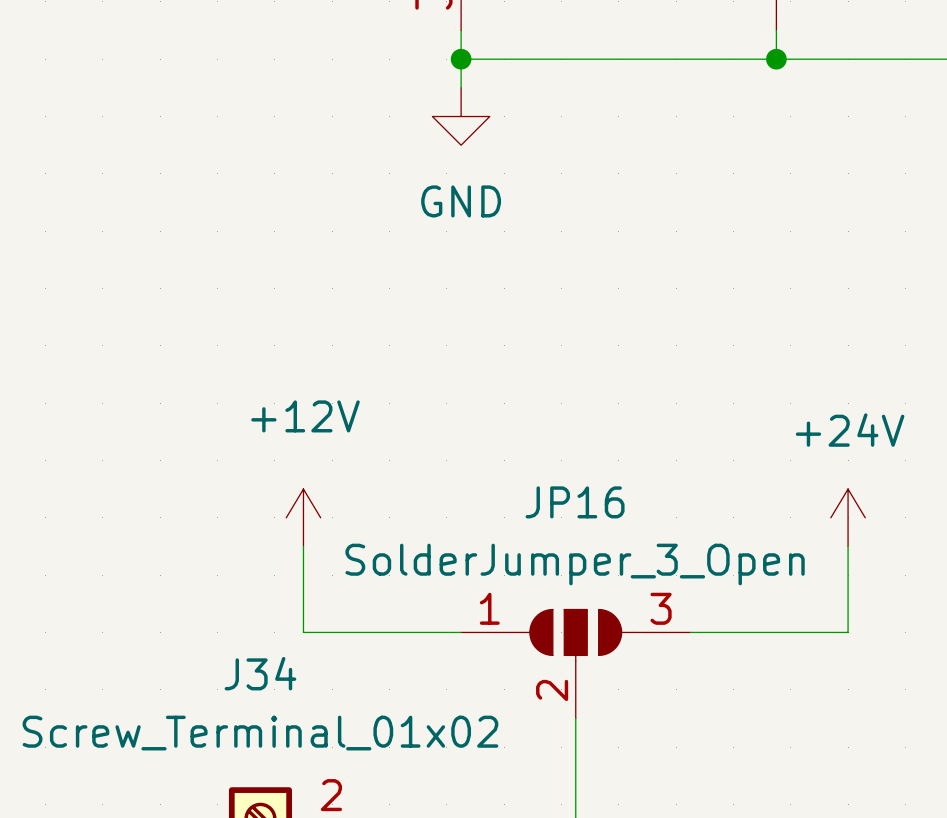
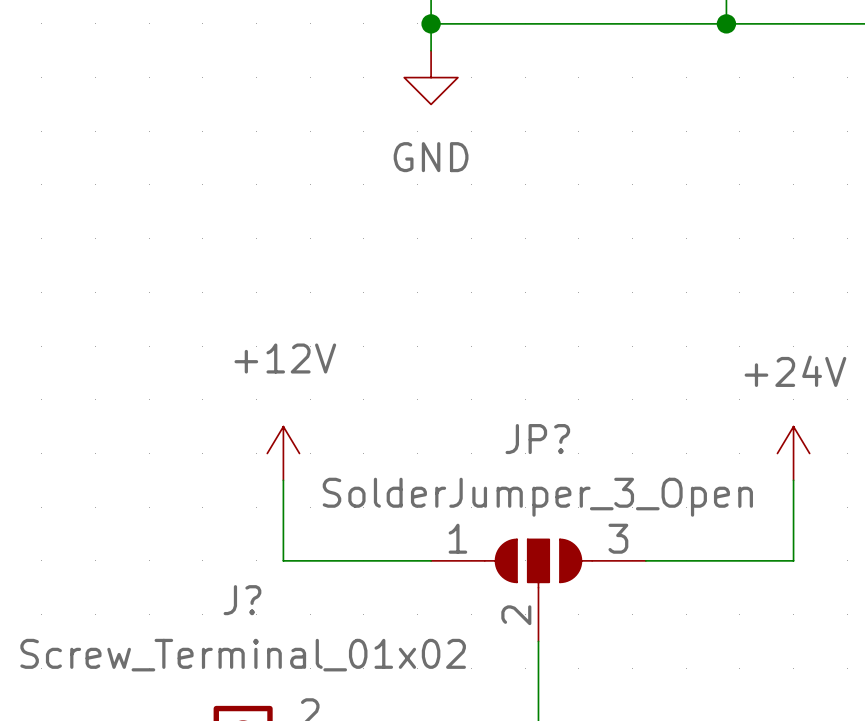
JP16 name: JP16 (575, 502) -> JP? (537, 439)
J34 name: J34 (260, 673) -> J? (242, 600)

